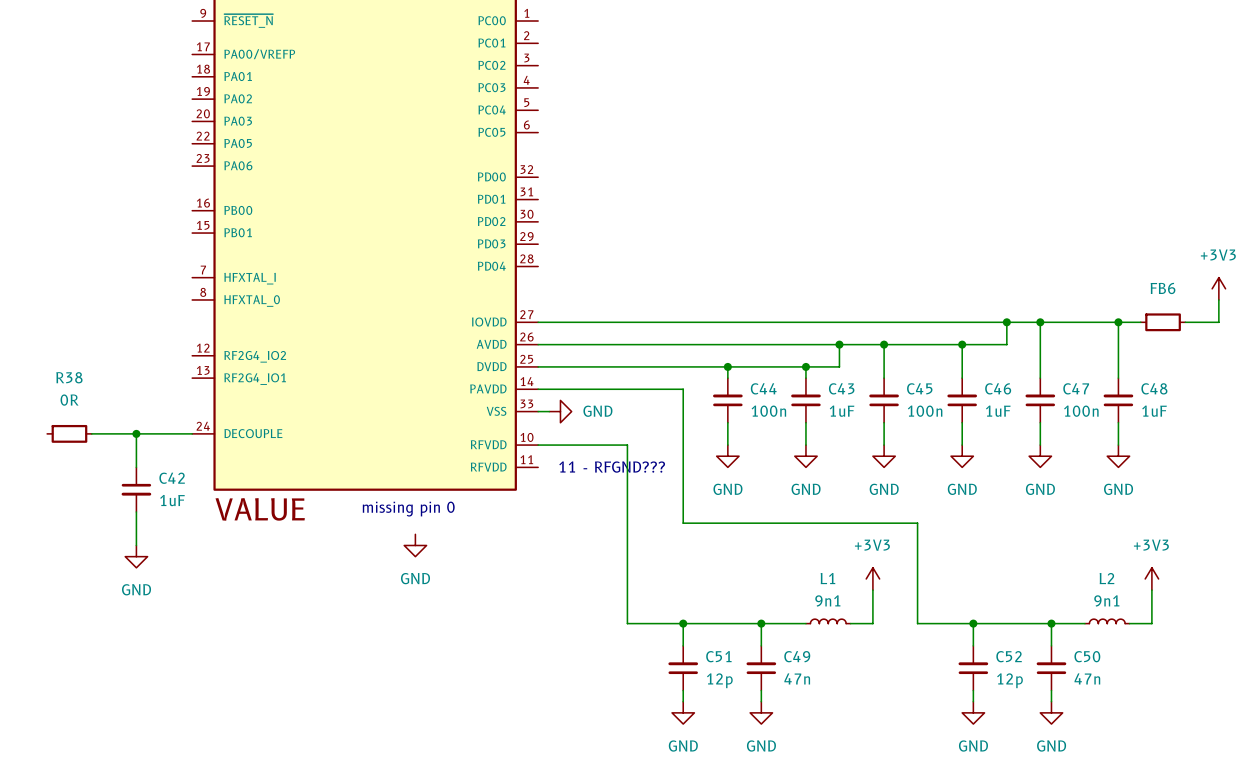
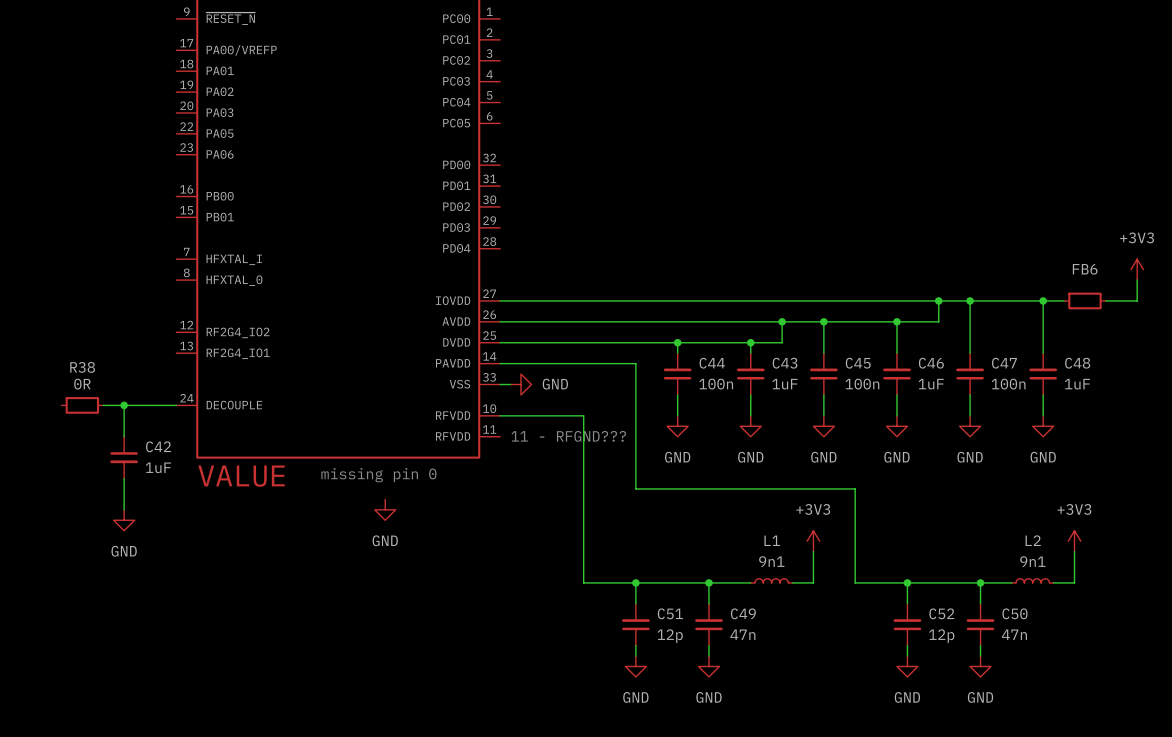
R38 name position: R38 (69, 377) -> R38 (82, 367)
R38 text position: 0R (69, 400) -> 0R (82, 384)
R38 position: (69, 433) -> (82, 405)
wire: (91, 433) (114, 433) -> none

